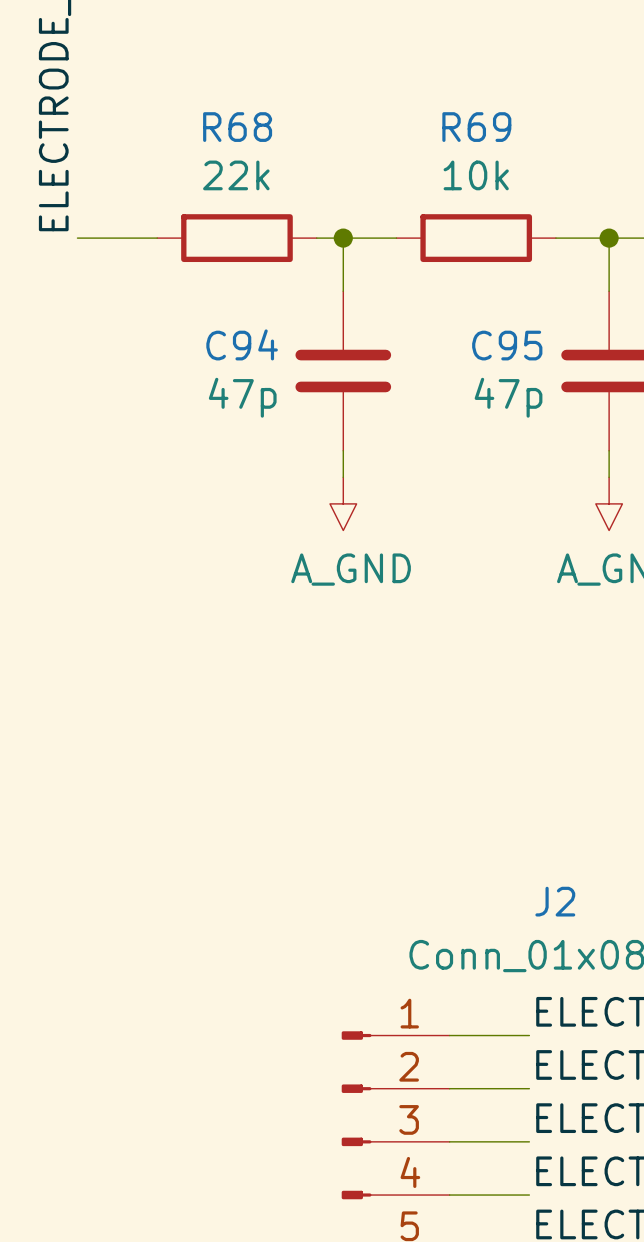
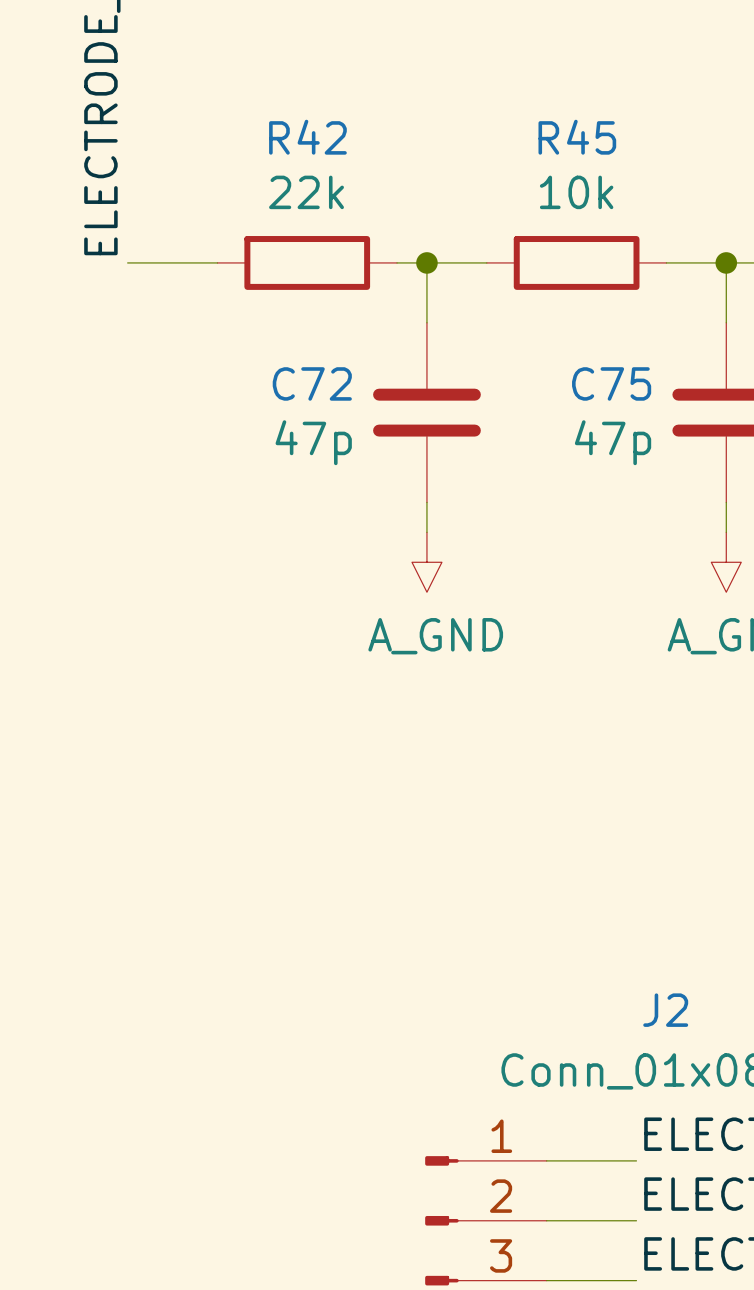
R68 name: R68 (237, 127) -> R42 (307, 137)
R69 name: R69 (476, 127) -> R45 (577, 137)
C94 name: C94 (242, 344) -> C72 (312, 383)
C95 name: C95 (507, 345) -> C75 (611, 383)

